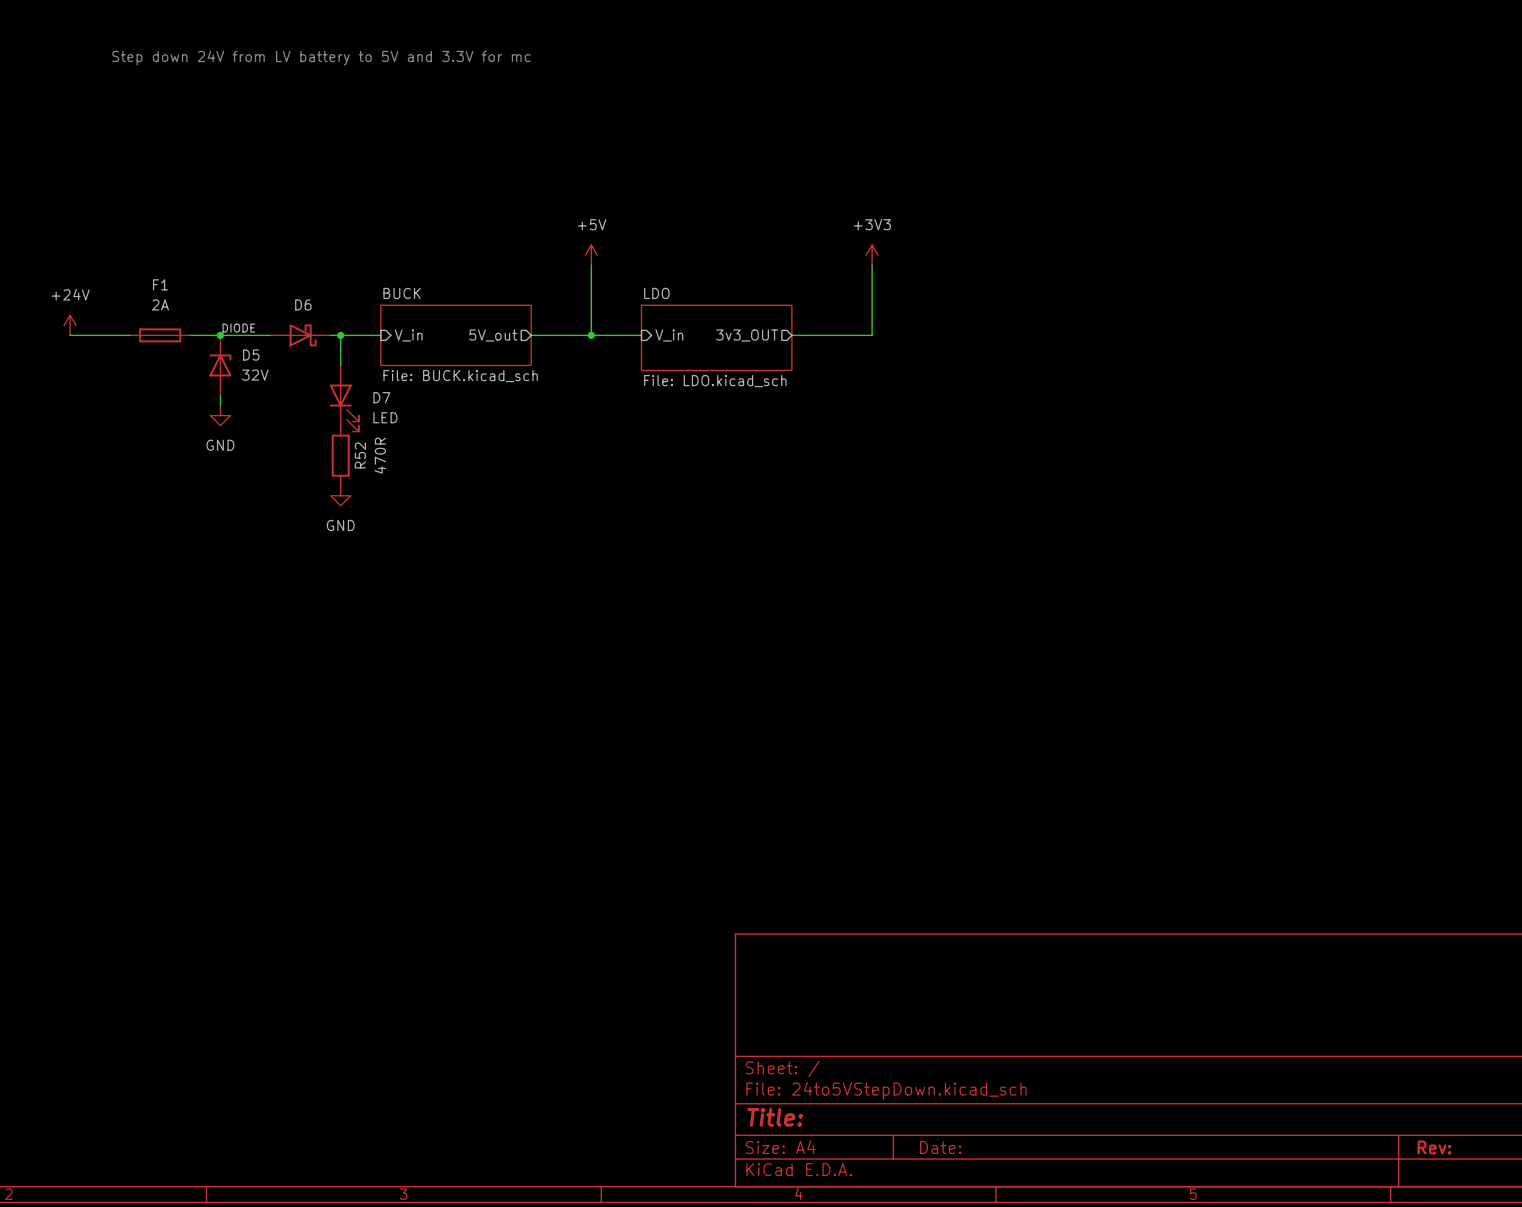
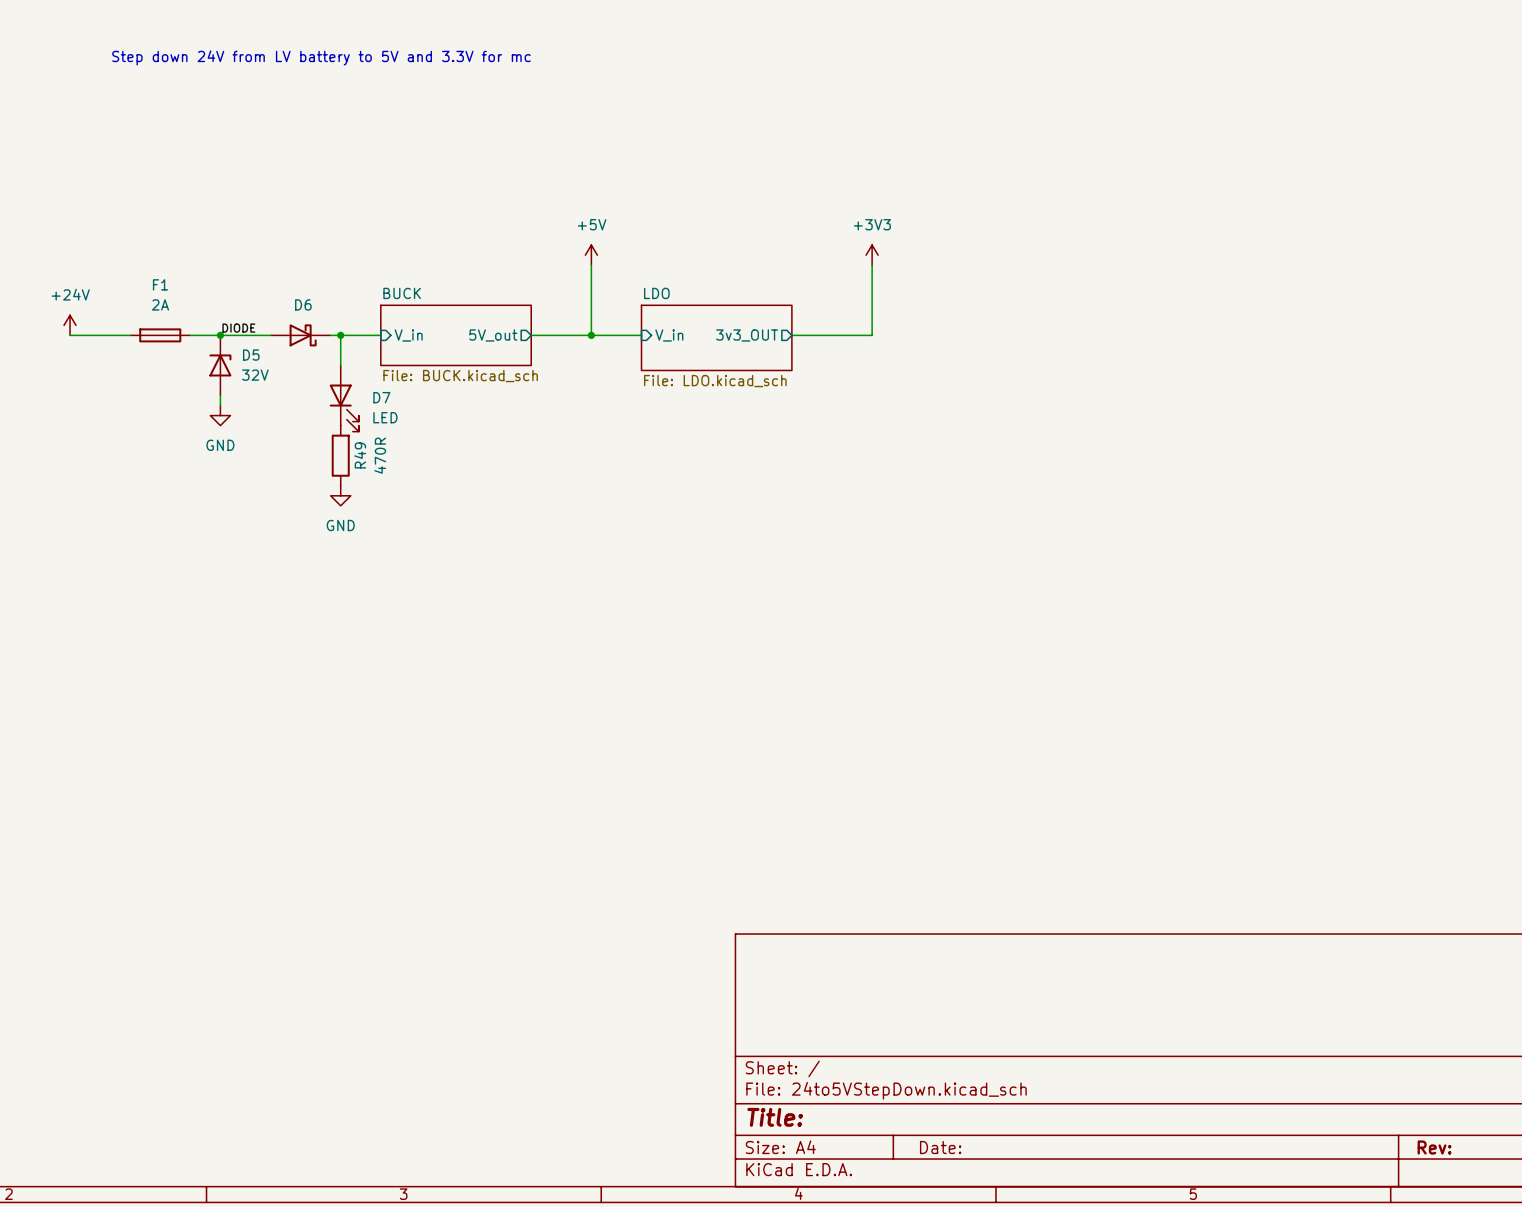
R52 name: R52 (360, 455) -> R49 (360, 455)

